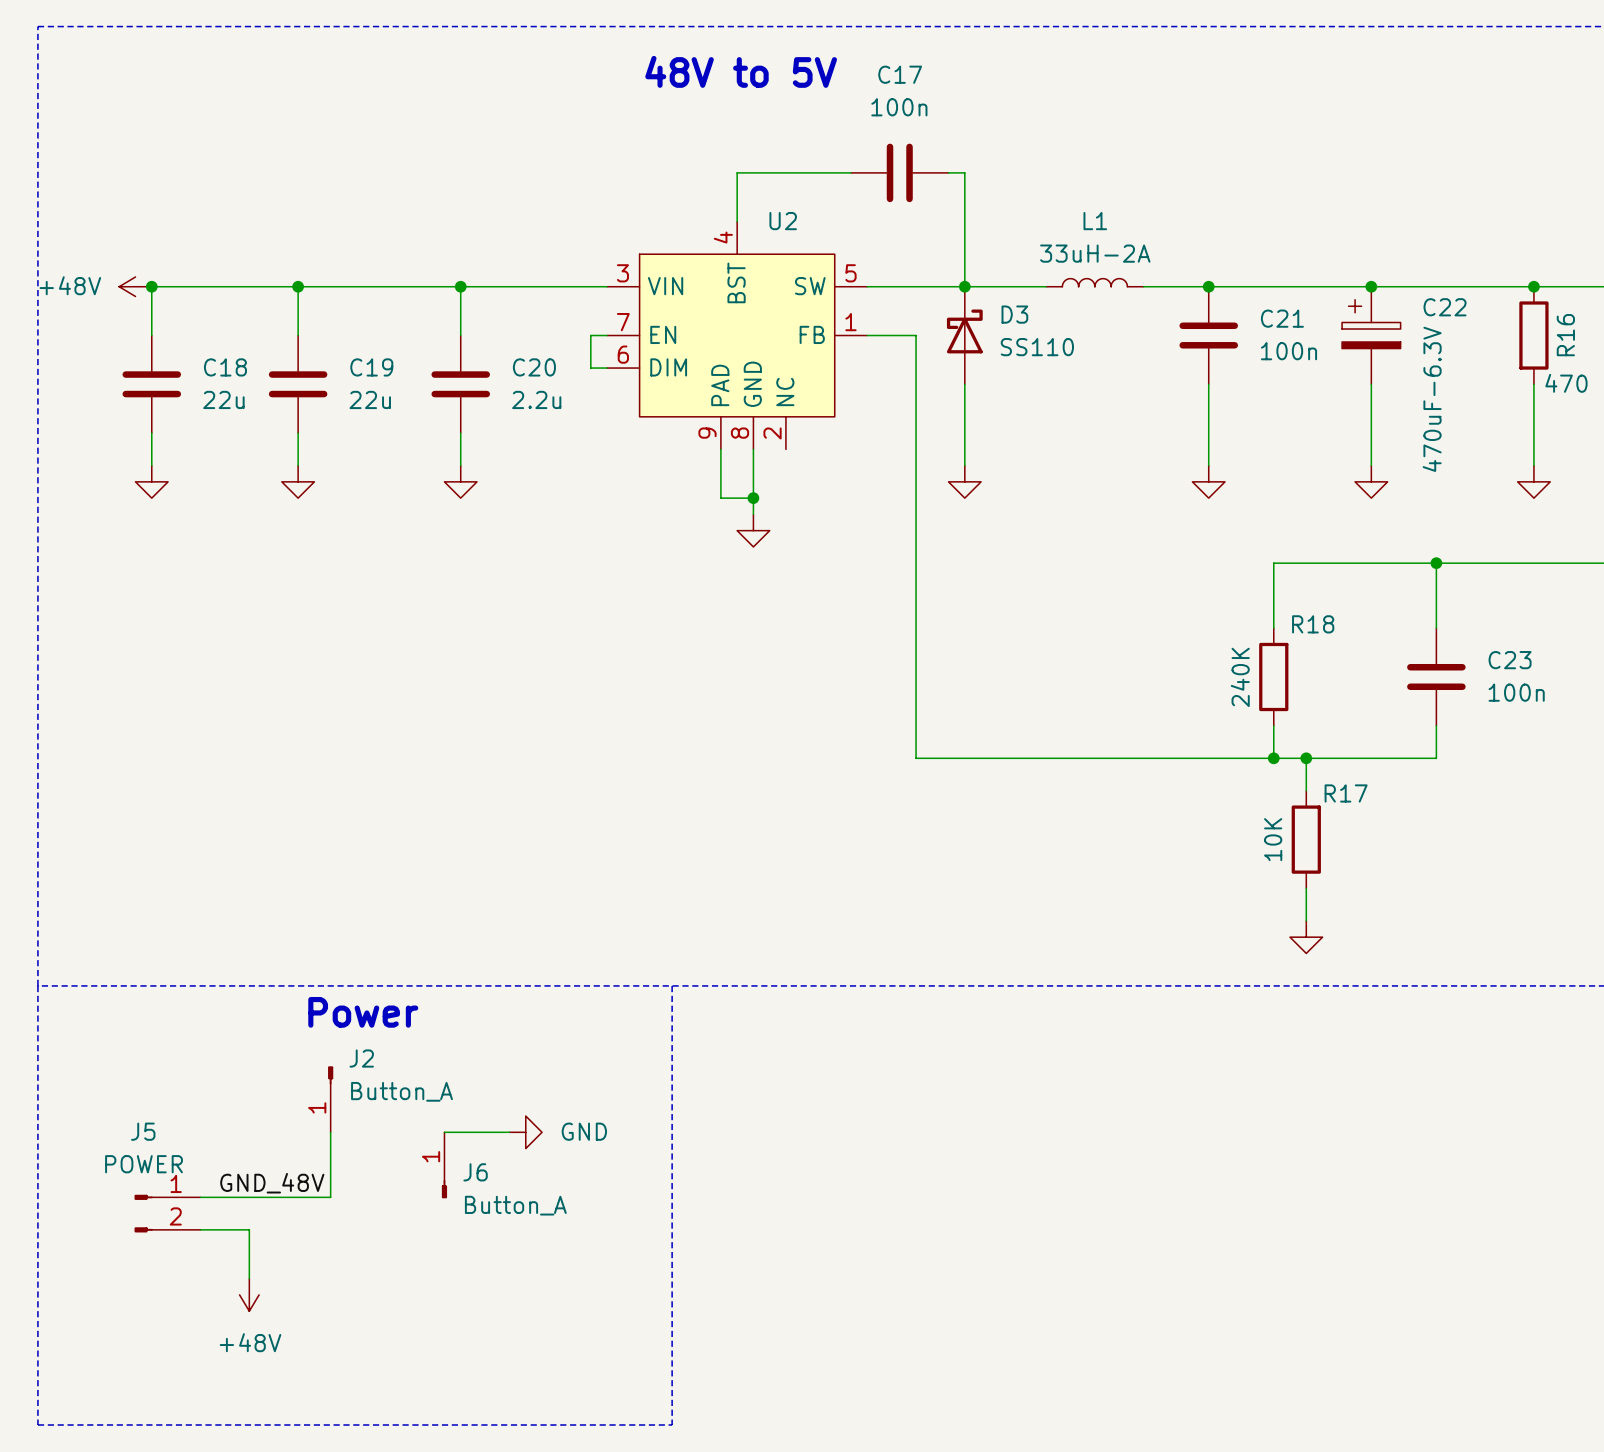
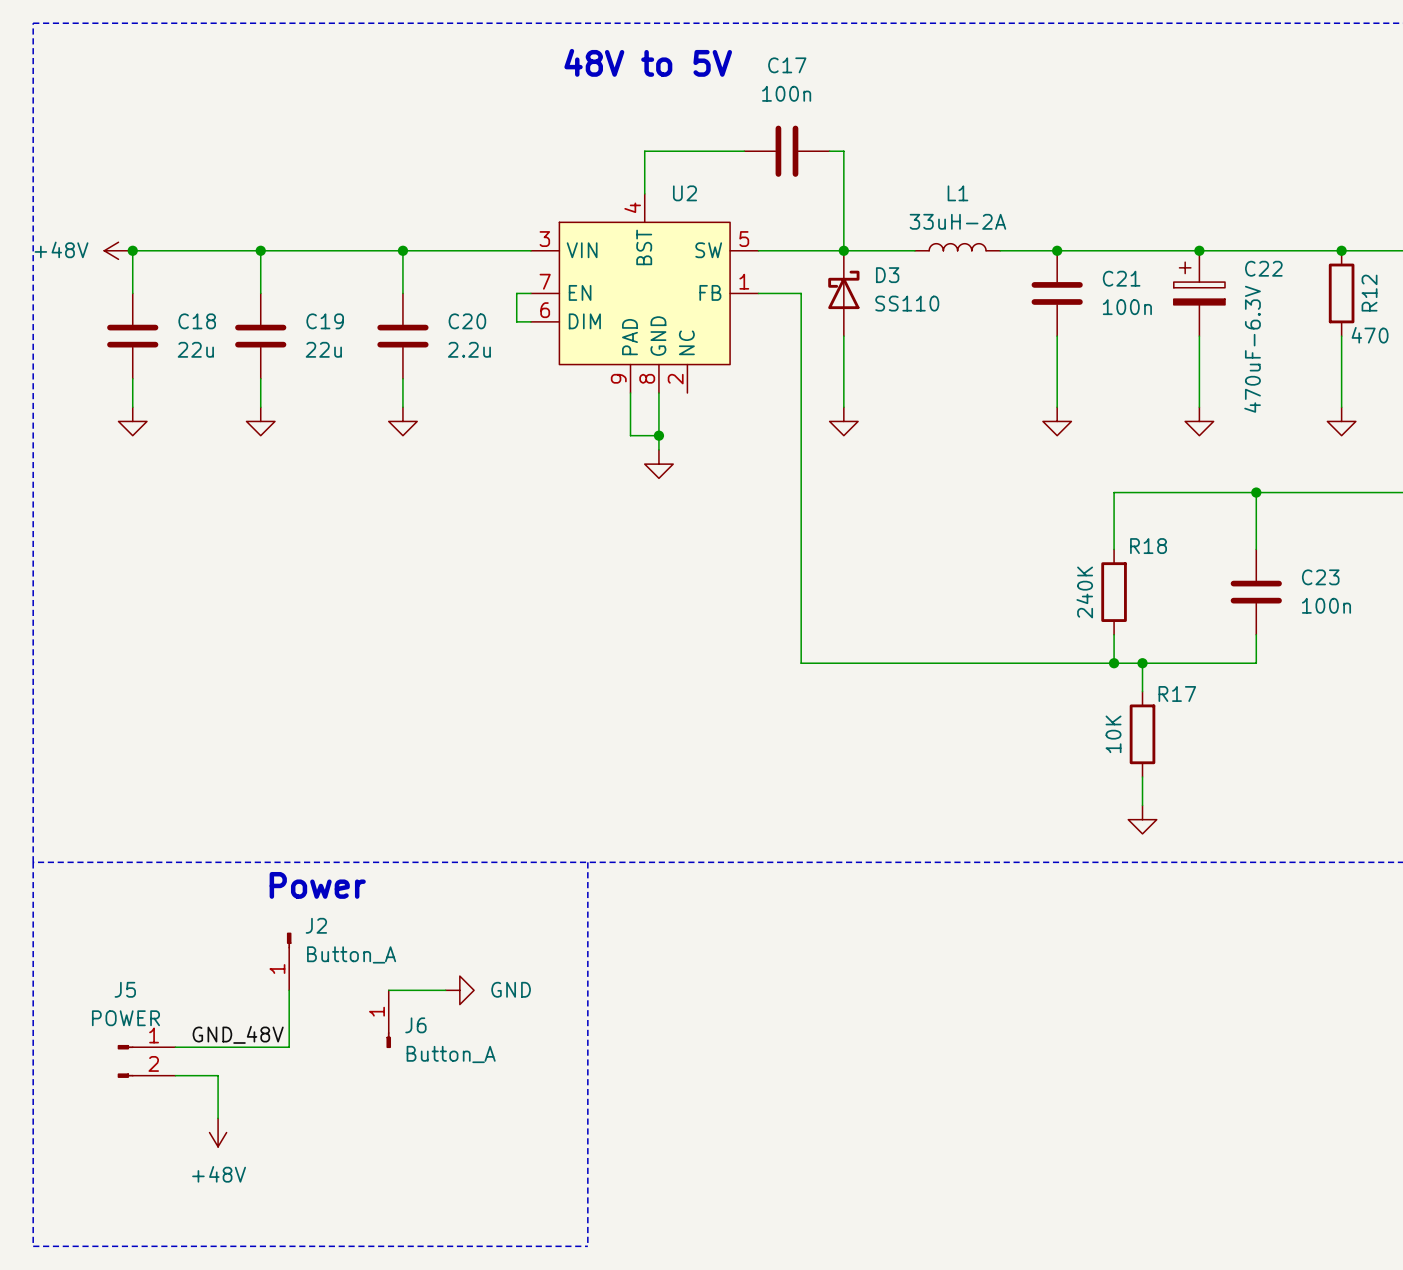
R16 name: R16 (1565, 335) -> R12 (1369, 293)

